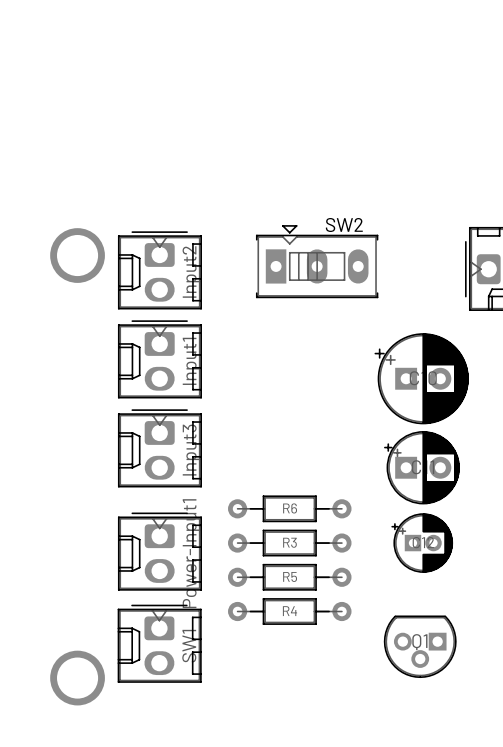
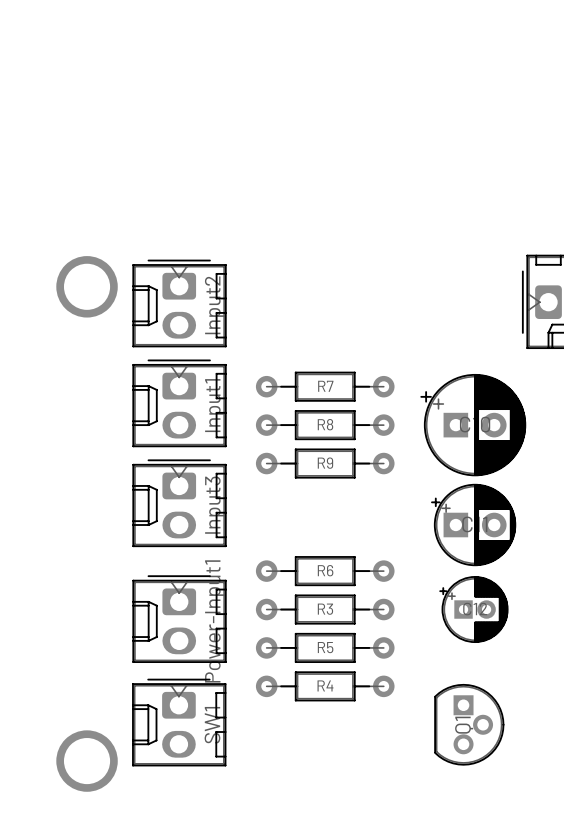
SW2: (317, 261) -> none
R7: none -> (325, 386)
R8: none -> (325, 425)
R9: none -> (325, 463)
Q1 rotation: 0° (420, 646) -> 90° counterclockwise (469, 724)

